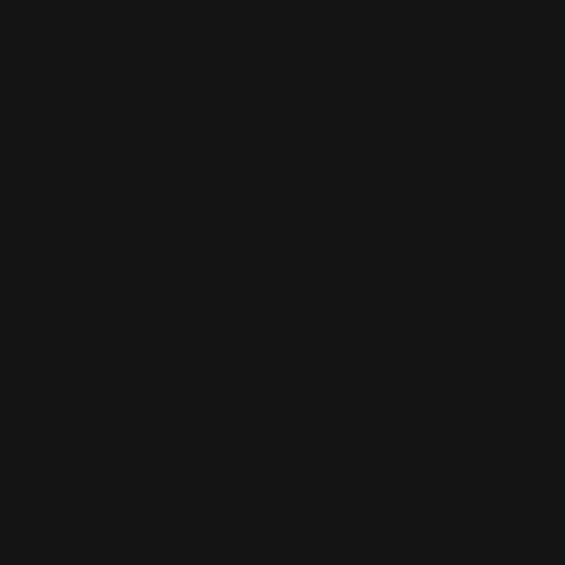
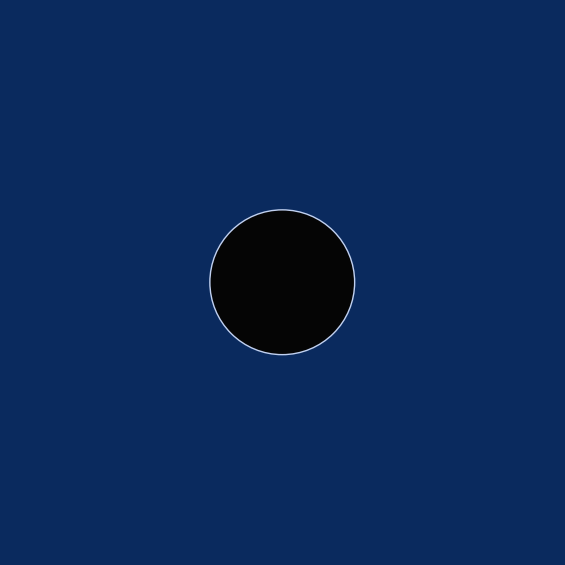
part: none -> (282, 282)

